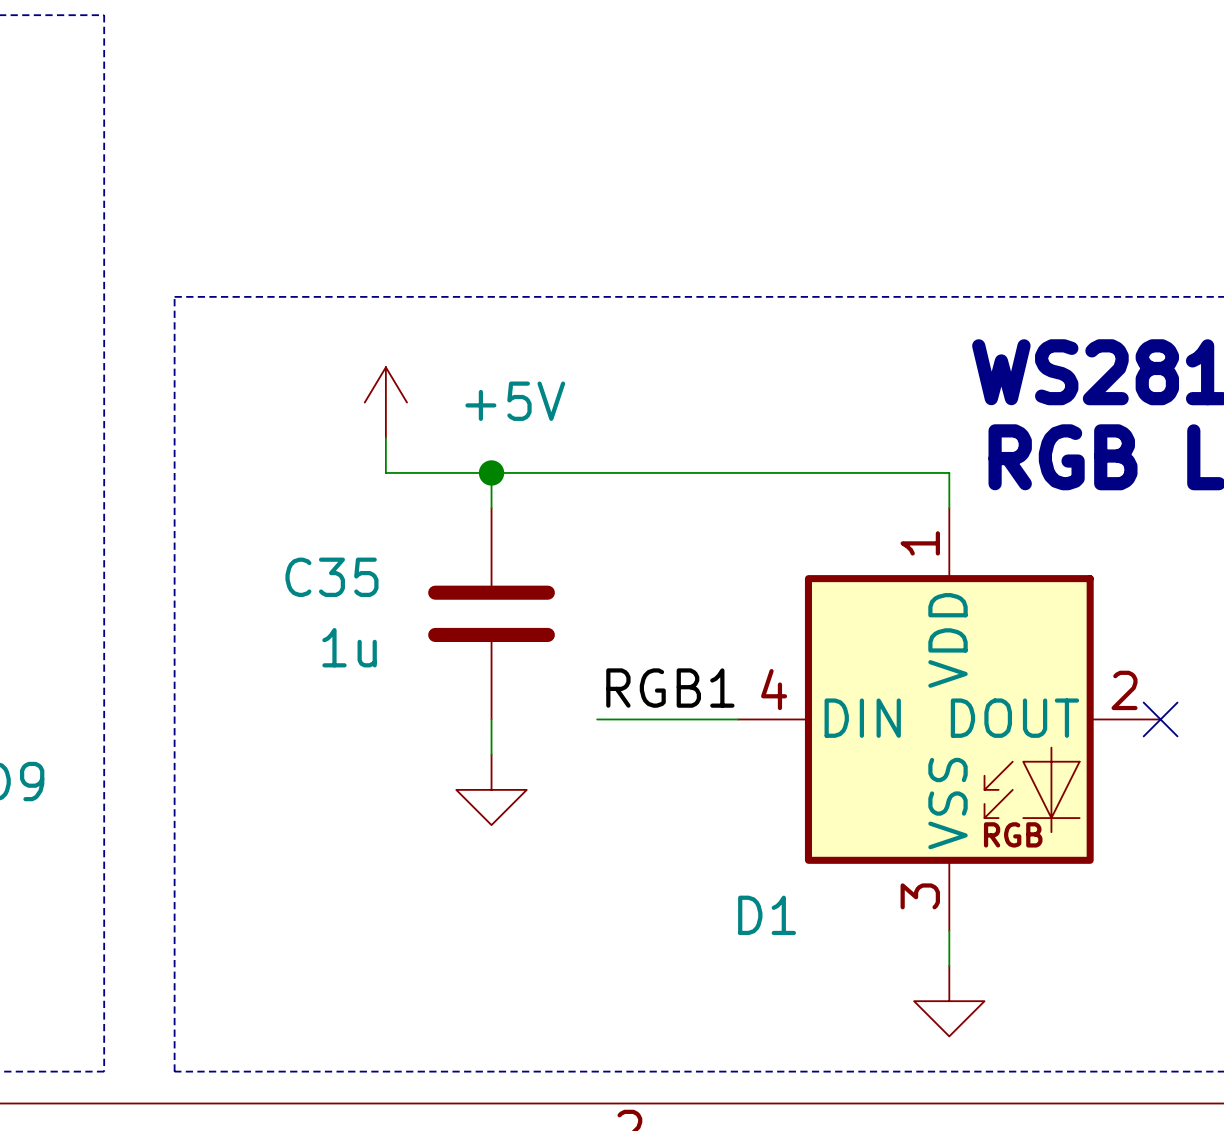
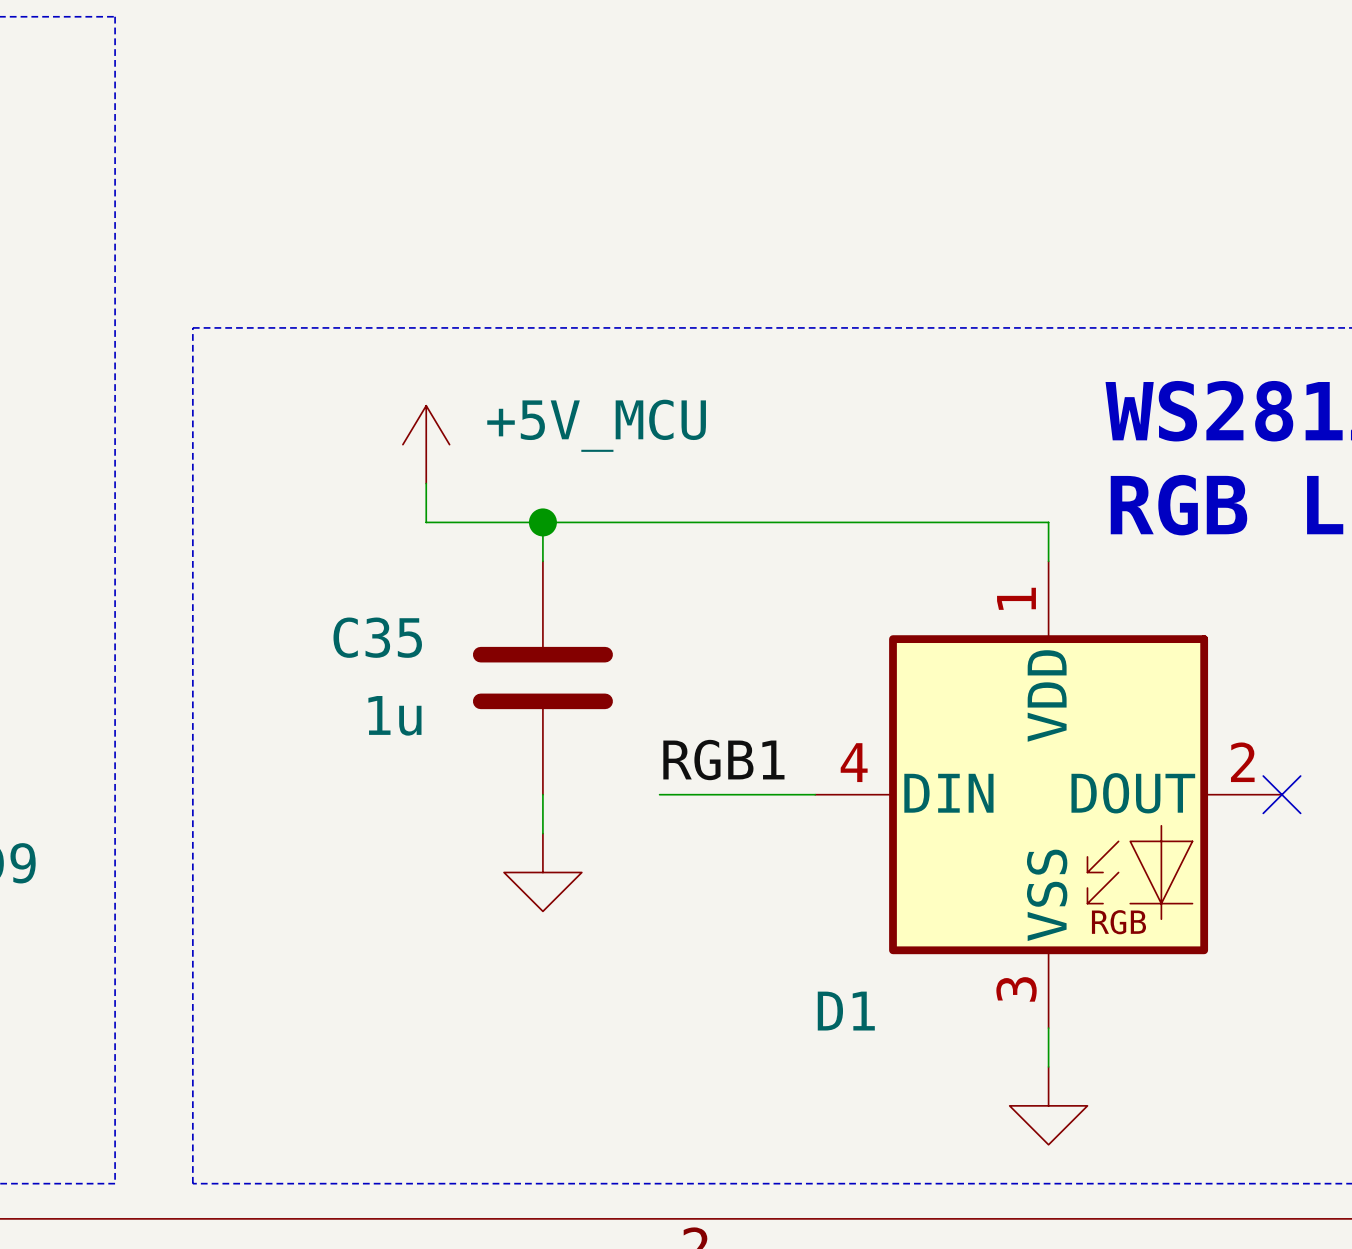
power symbol: +5V (385, 402) -> +5V_MCU (426, 444)

